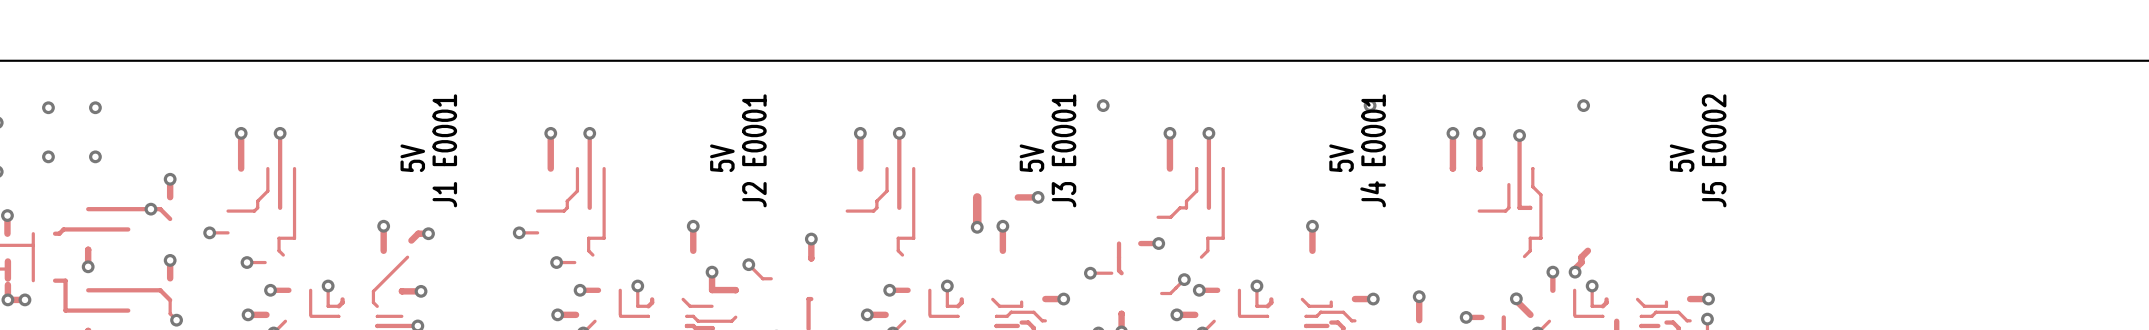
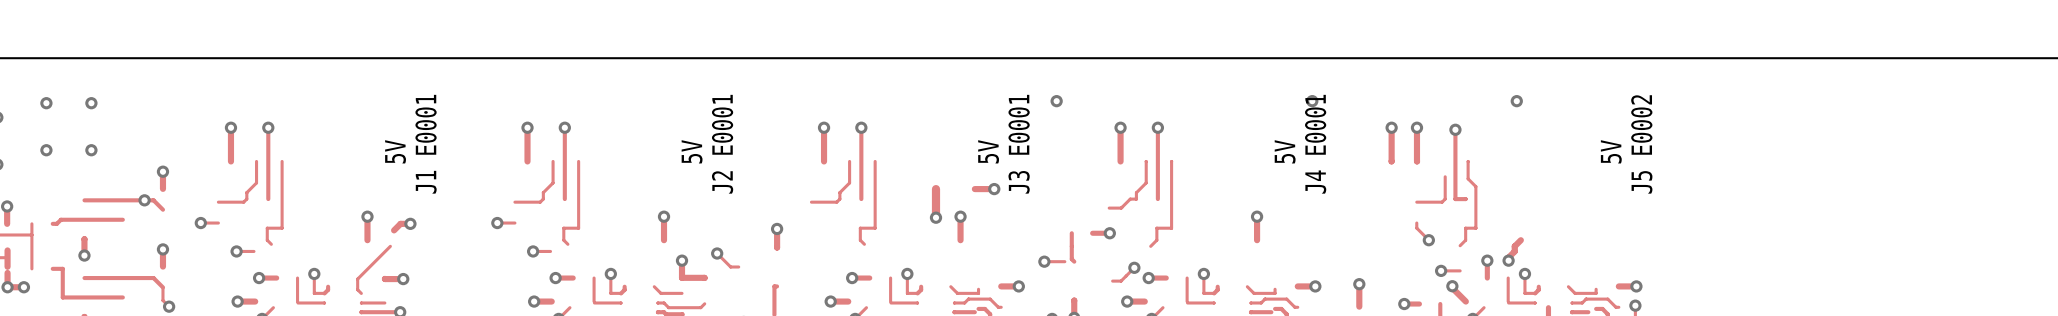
track: none -> (1416, 223) (1416, 228) (1428, 240)
via: none -> (1428, 240)
track: none -> (1441, 270) (1460, 270)
via: none -> (1441, 270)

